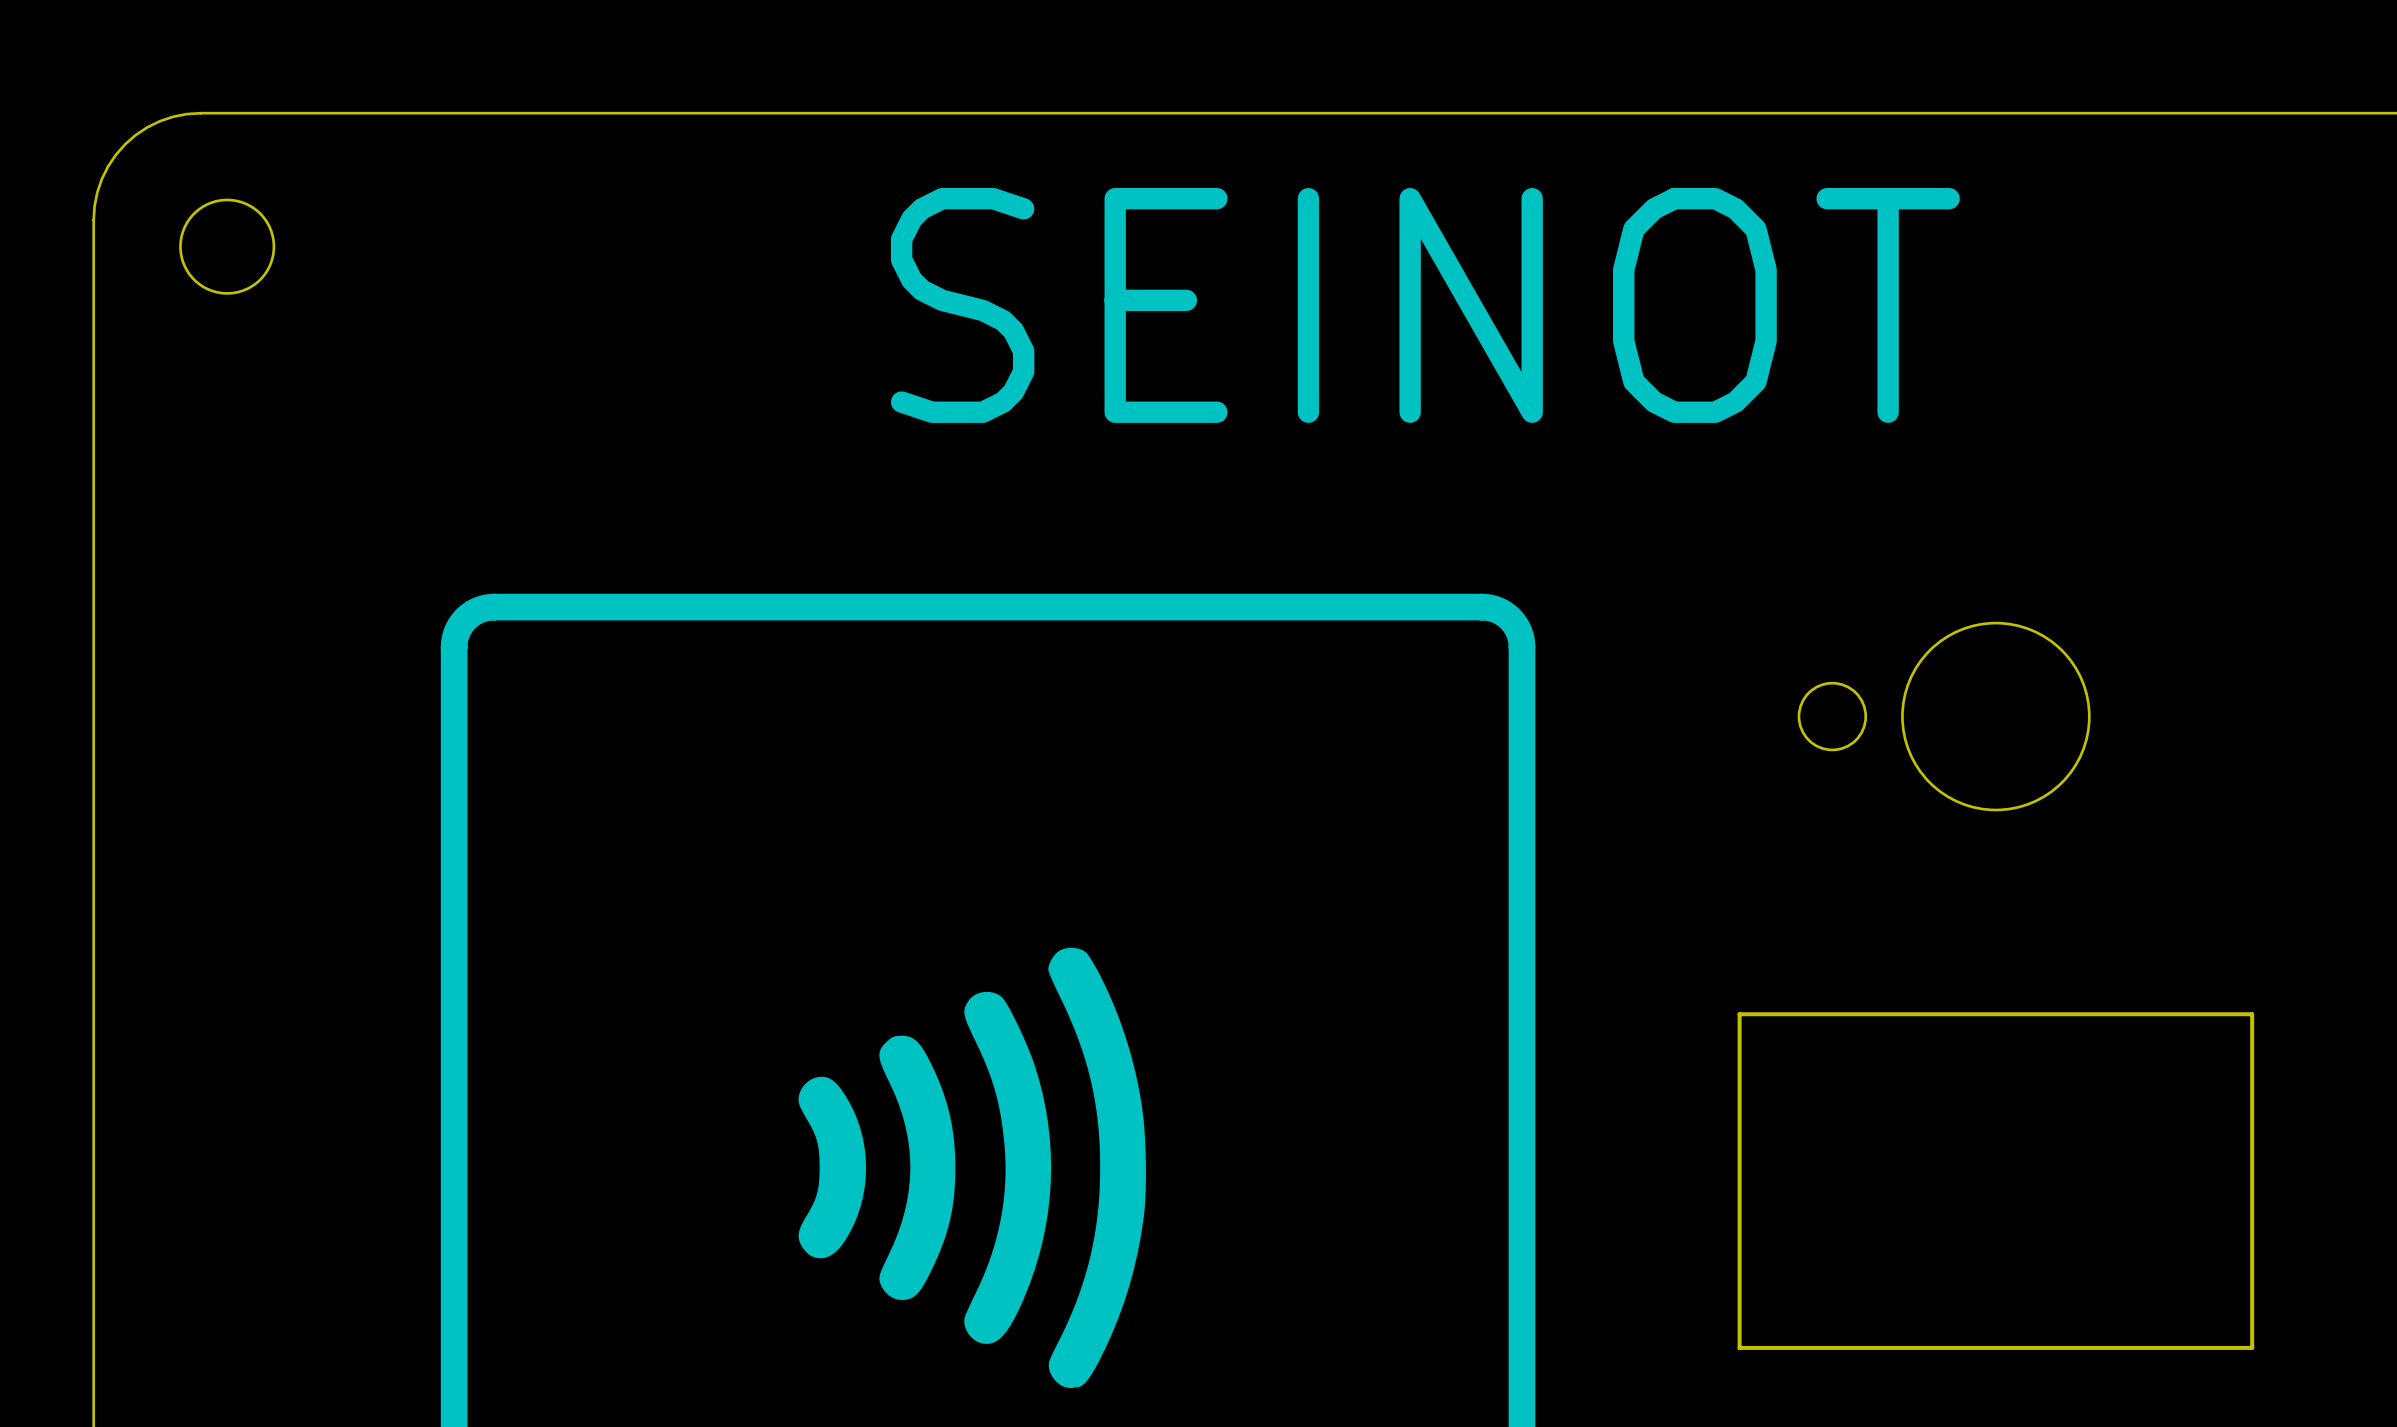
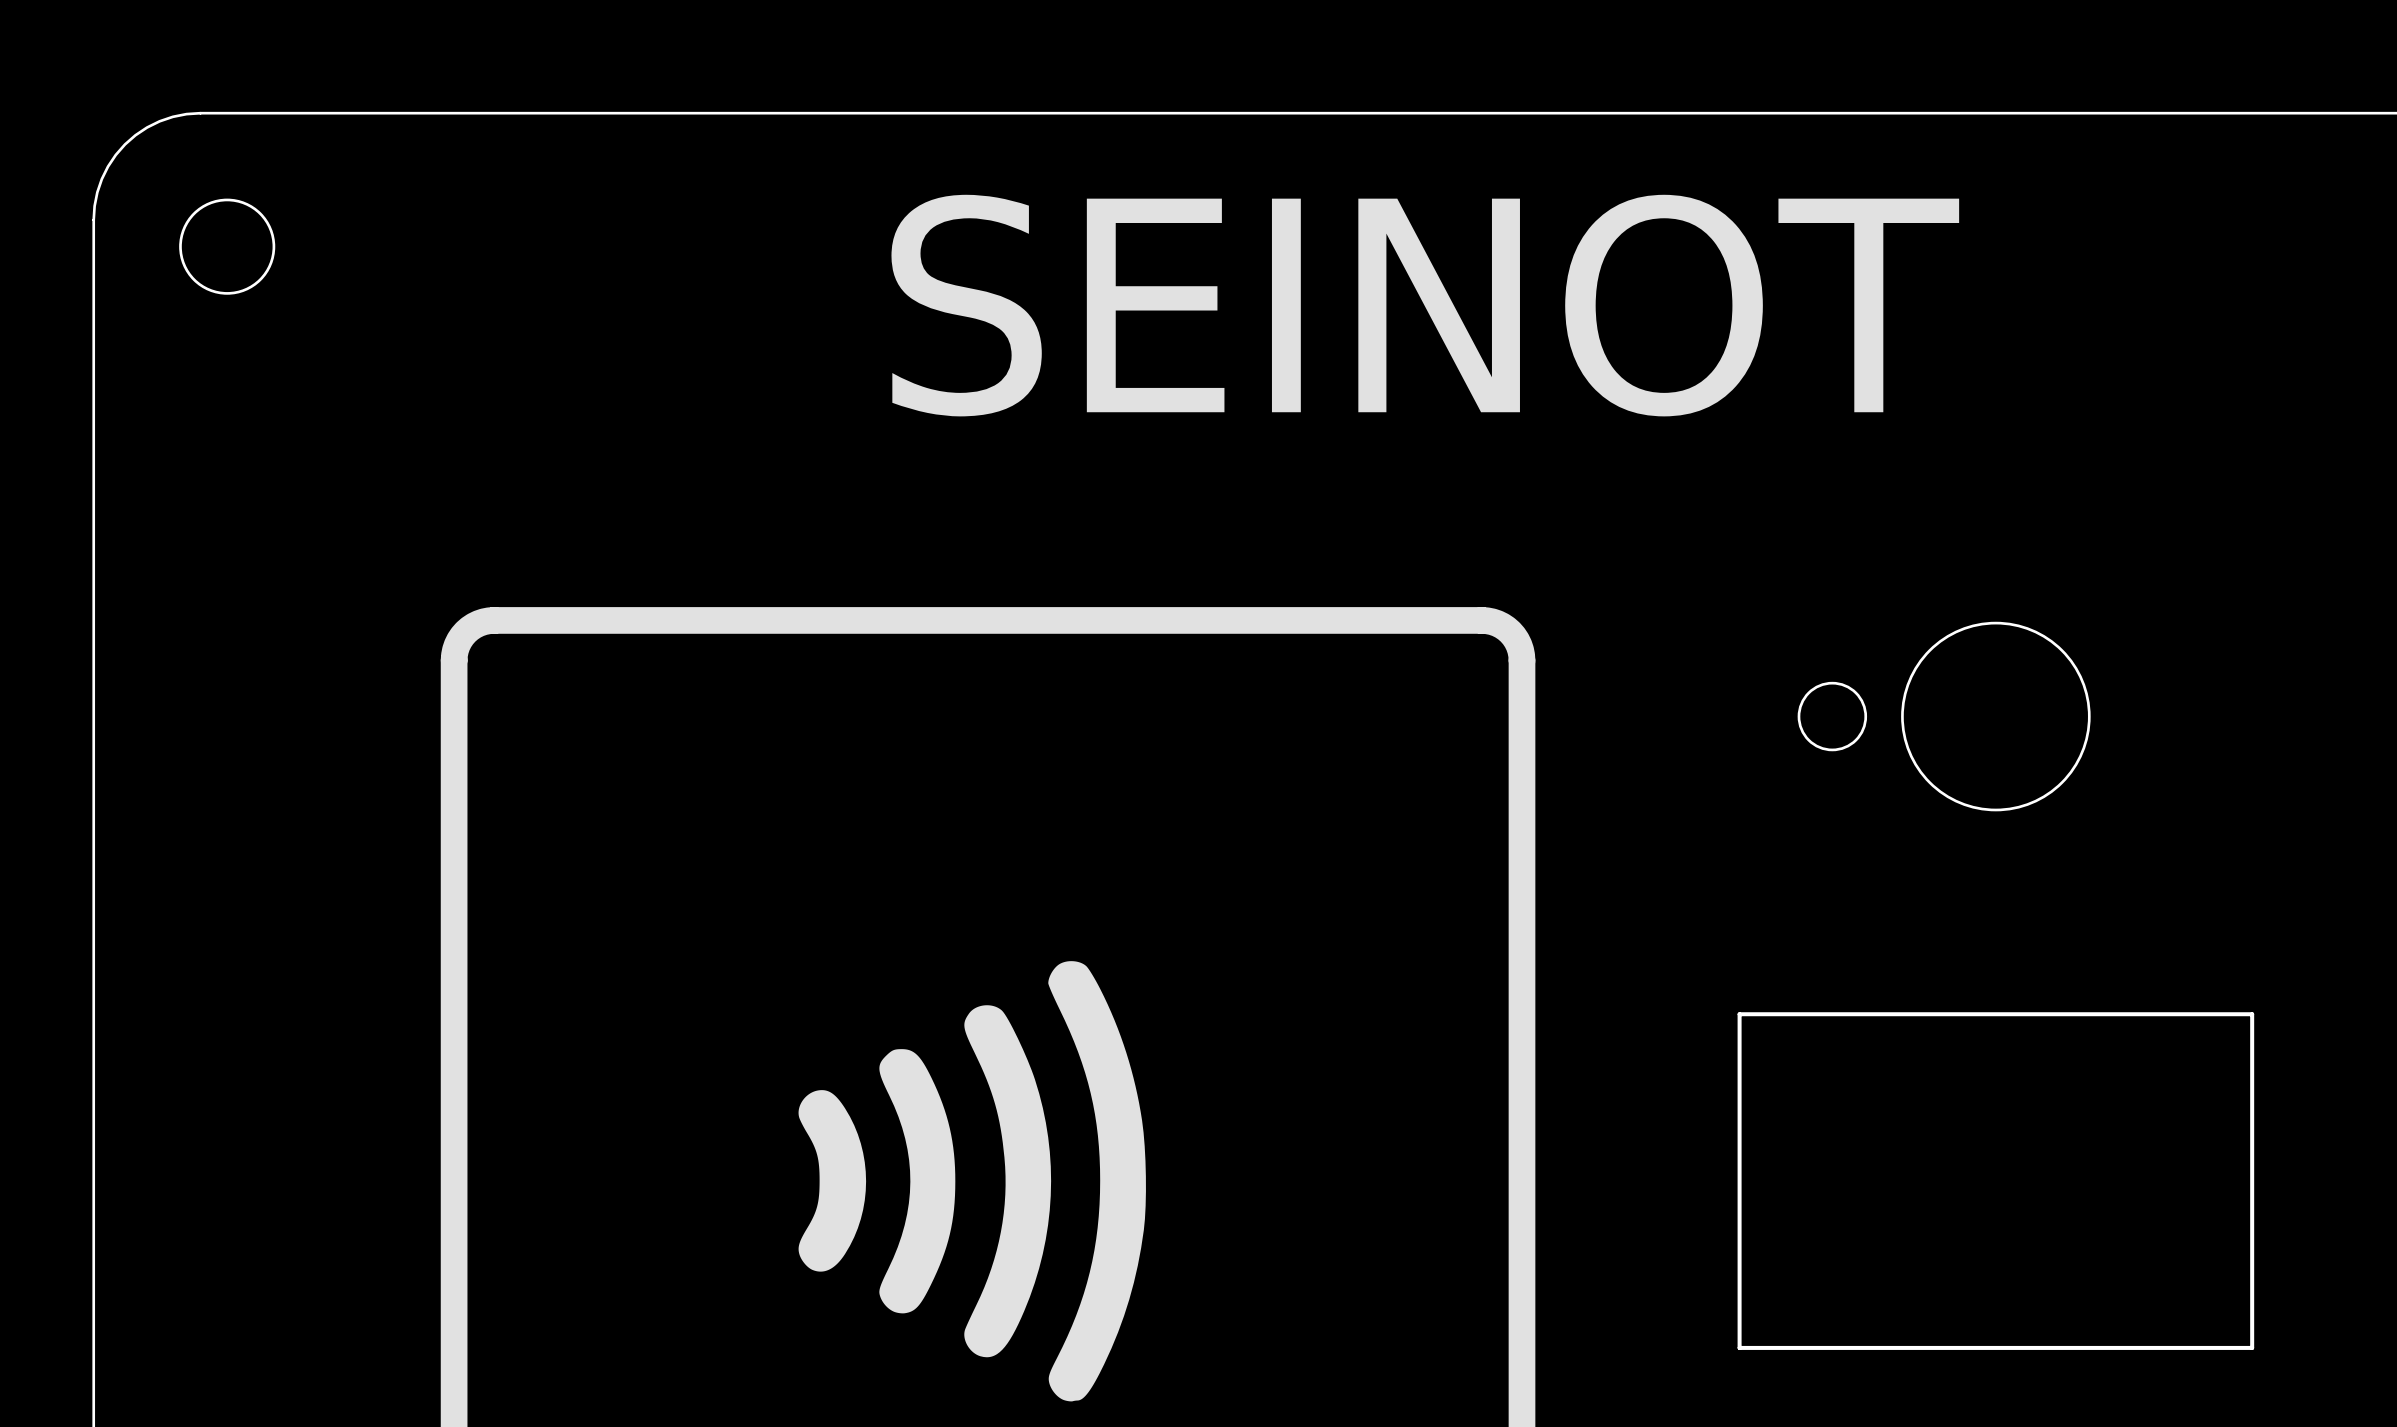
line: (454, 660) (455, 636) (462, 622) (474, 612) (494, 607) (1481, 607) (1501, 612) (1513, 622) (1520, 636) (1522, 660) -> (454, 660) (457, 645) (465, 632) (478, 623) (494, 620) (1481, 620) (1497, 623) (1510, 632) (1518, 645) (1522, 660)
drawing position: (832, 1167) -> (832, 1180)
drawing position: (917, 1167) -> (917, 1181)
drawing position: (1007, 1167) -> (1007, 1181)
drawing position: (1097, 1167) -> (1097, 1181)

